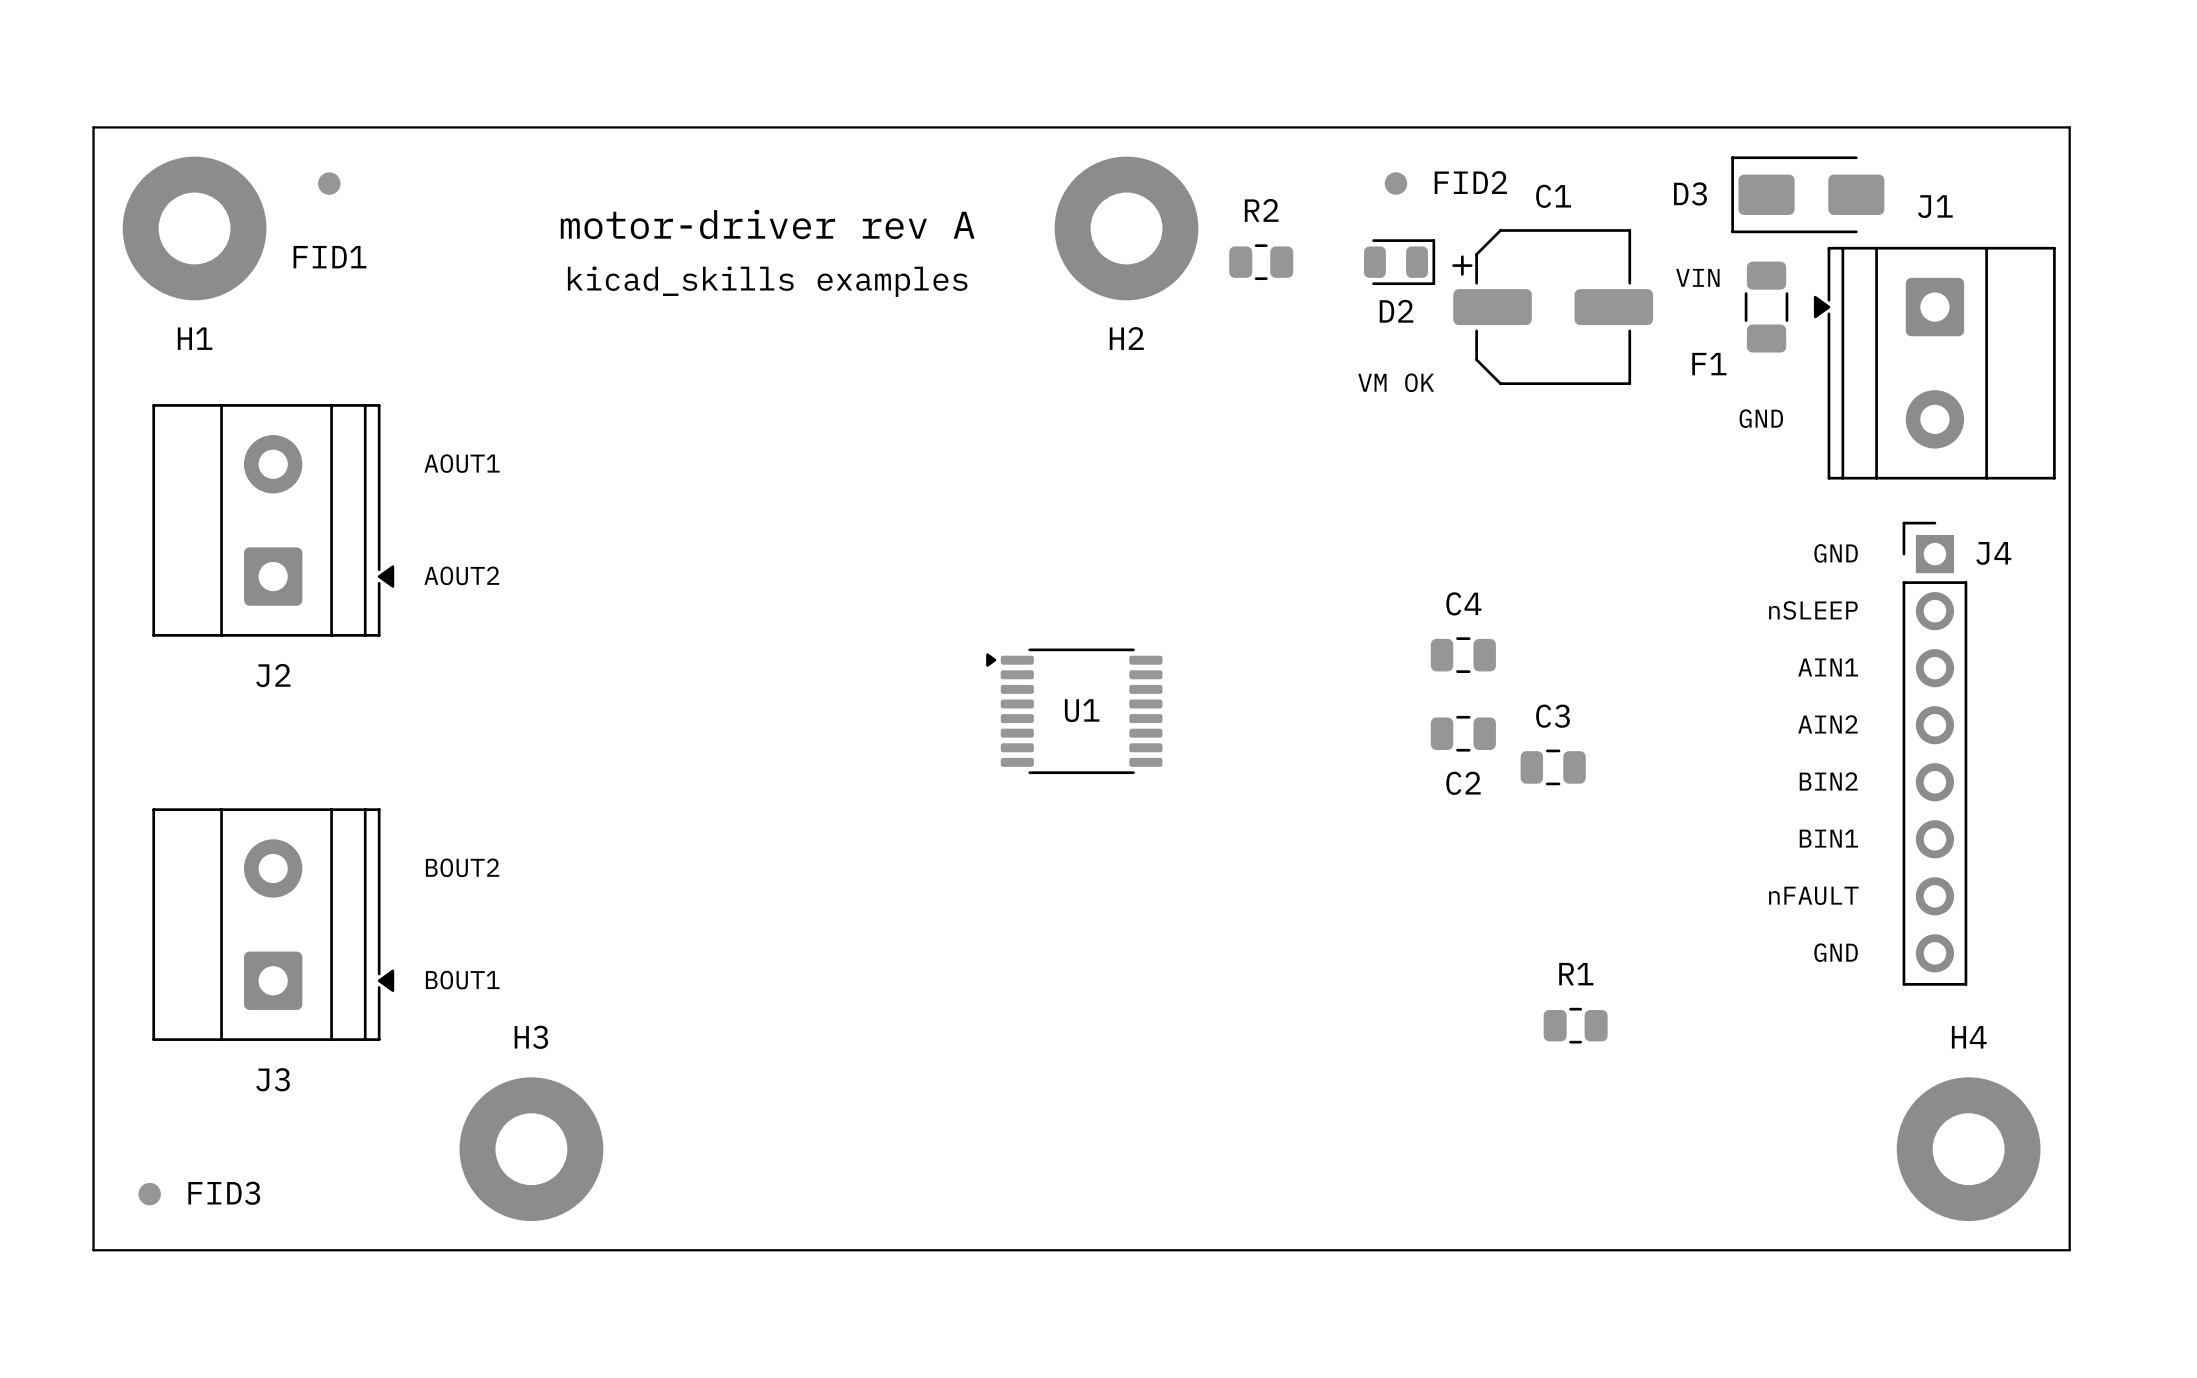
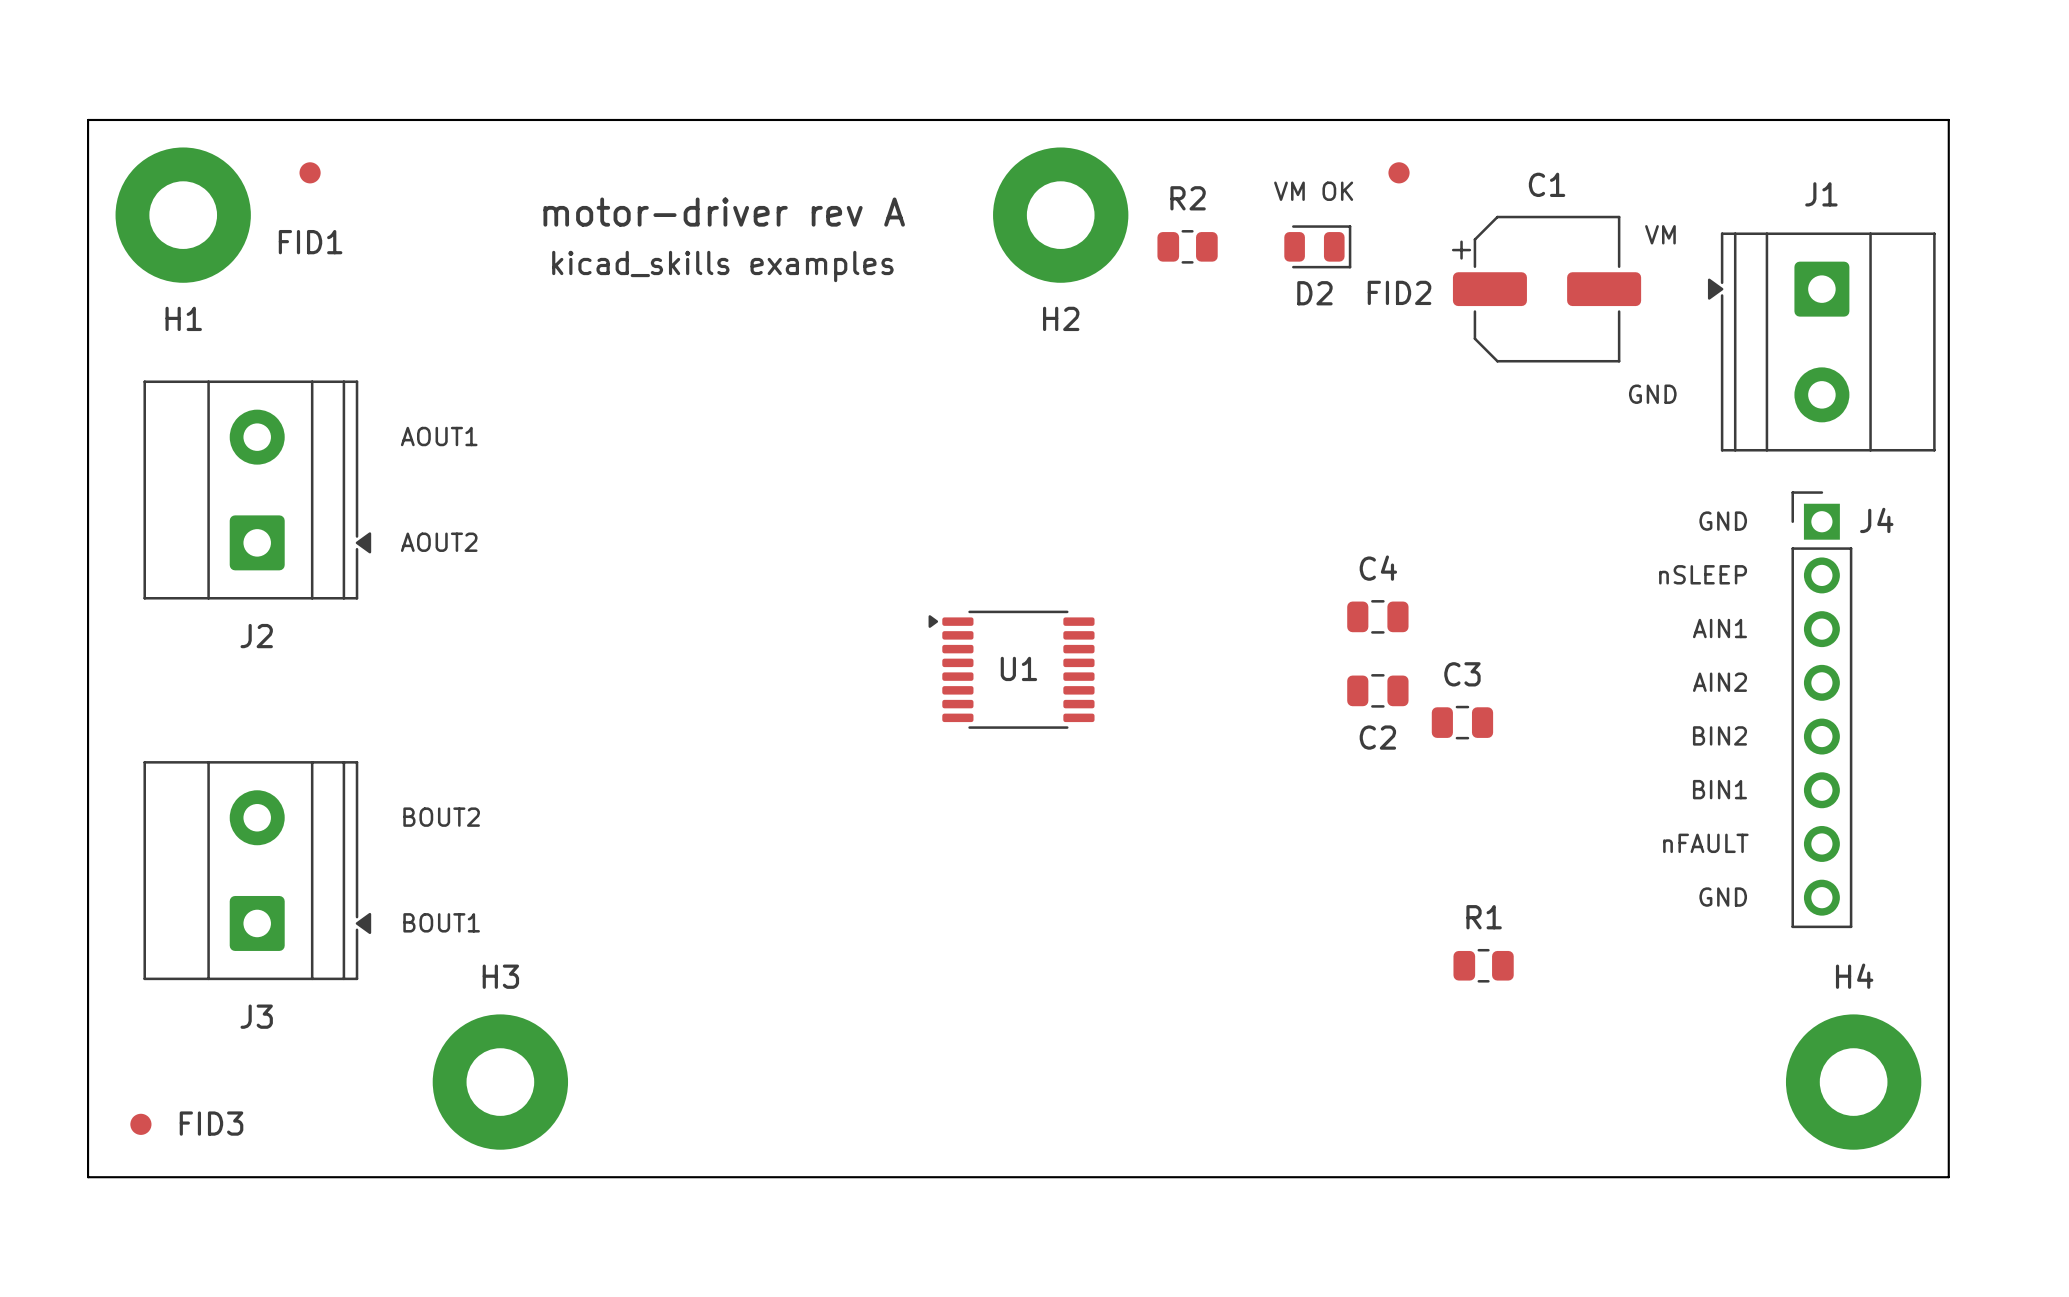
FID2 name position: FID2 (1470, 182) -> FID2 (1399, 292)
FID2 position: (1395, 183) -> (1399, 172)
D3: (1807, 194) -> none
text: none -> VM (1660, 234)
text: VIN (1697, 277) -> none
C1 position: (1552, 307) -> (1546, 289)
F1: (1766, 307) -> none
text position: VM OK (1396, 382) -> VM OK (1313, 191)

